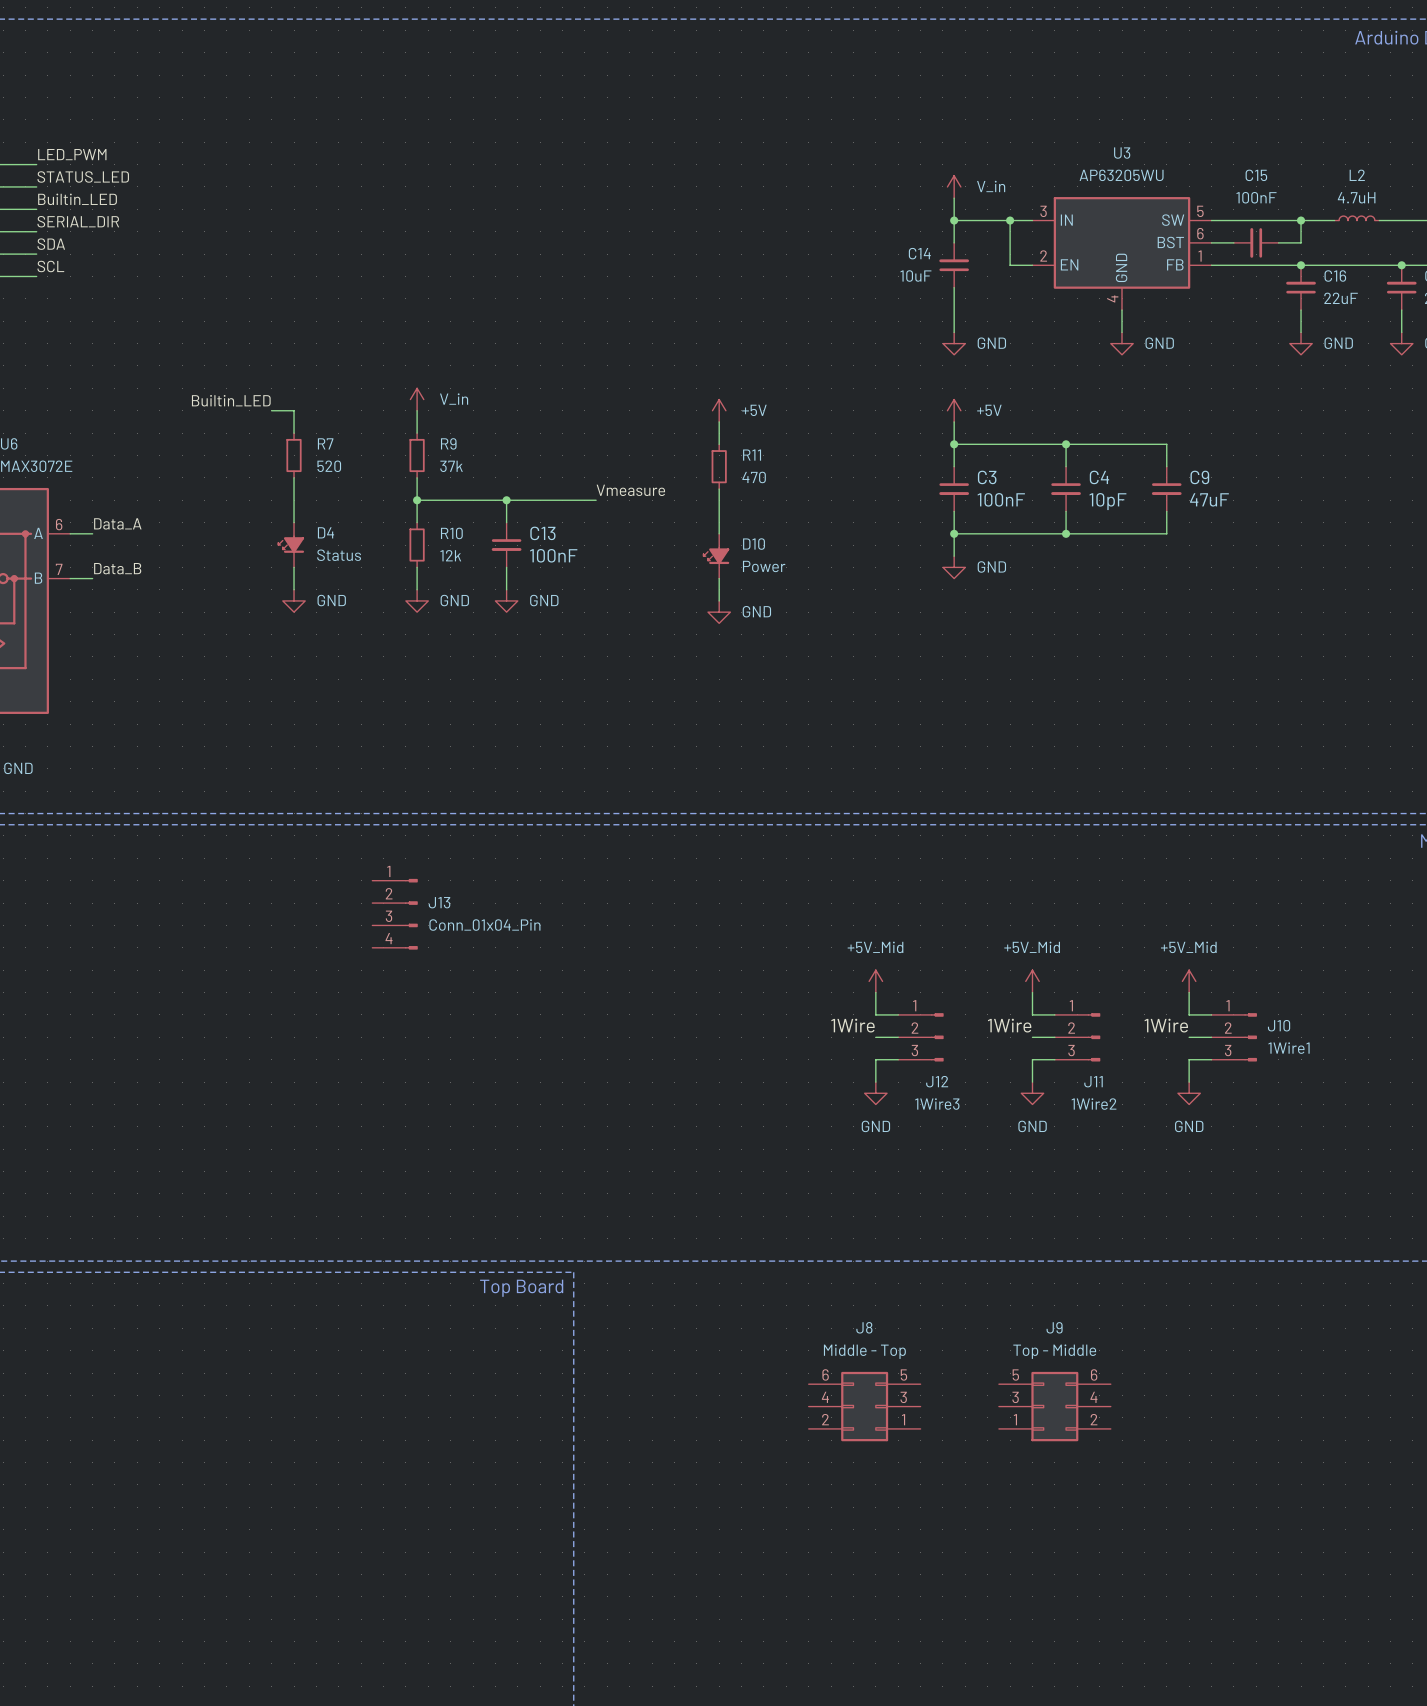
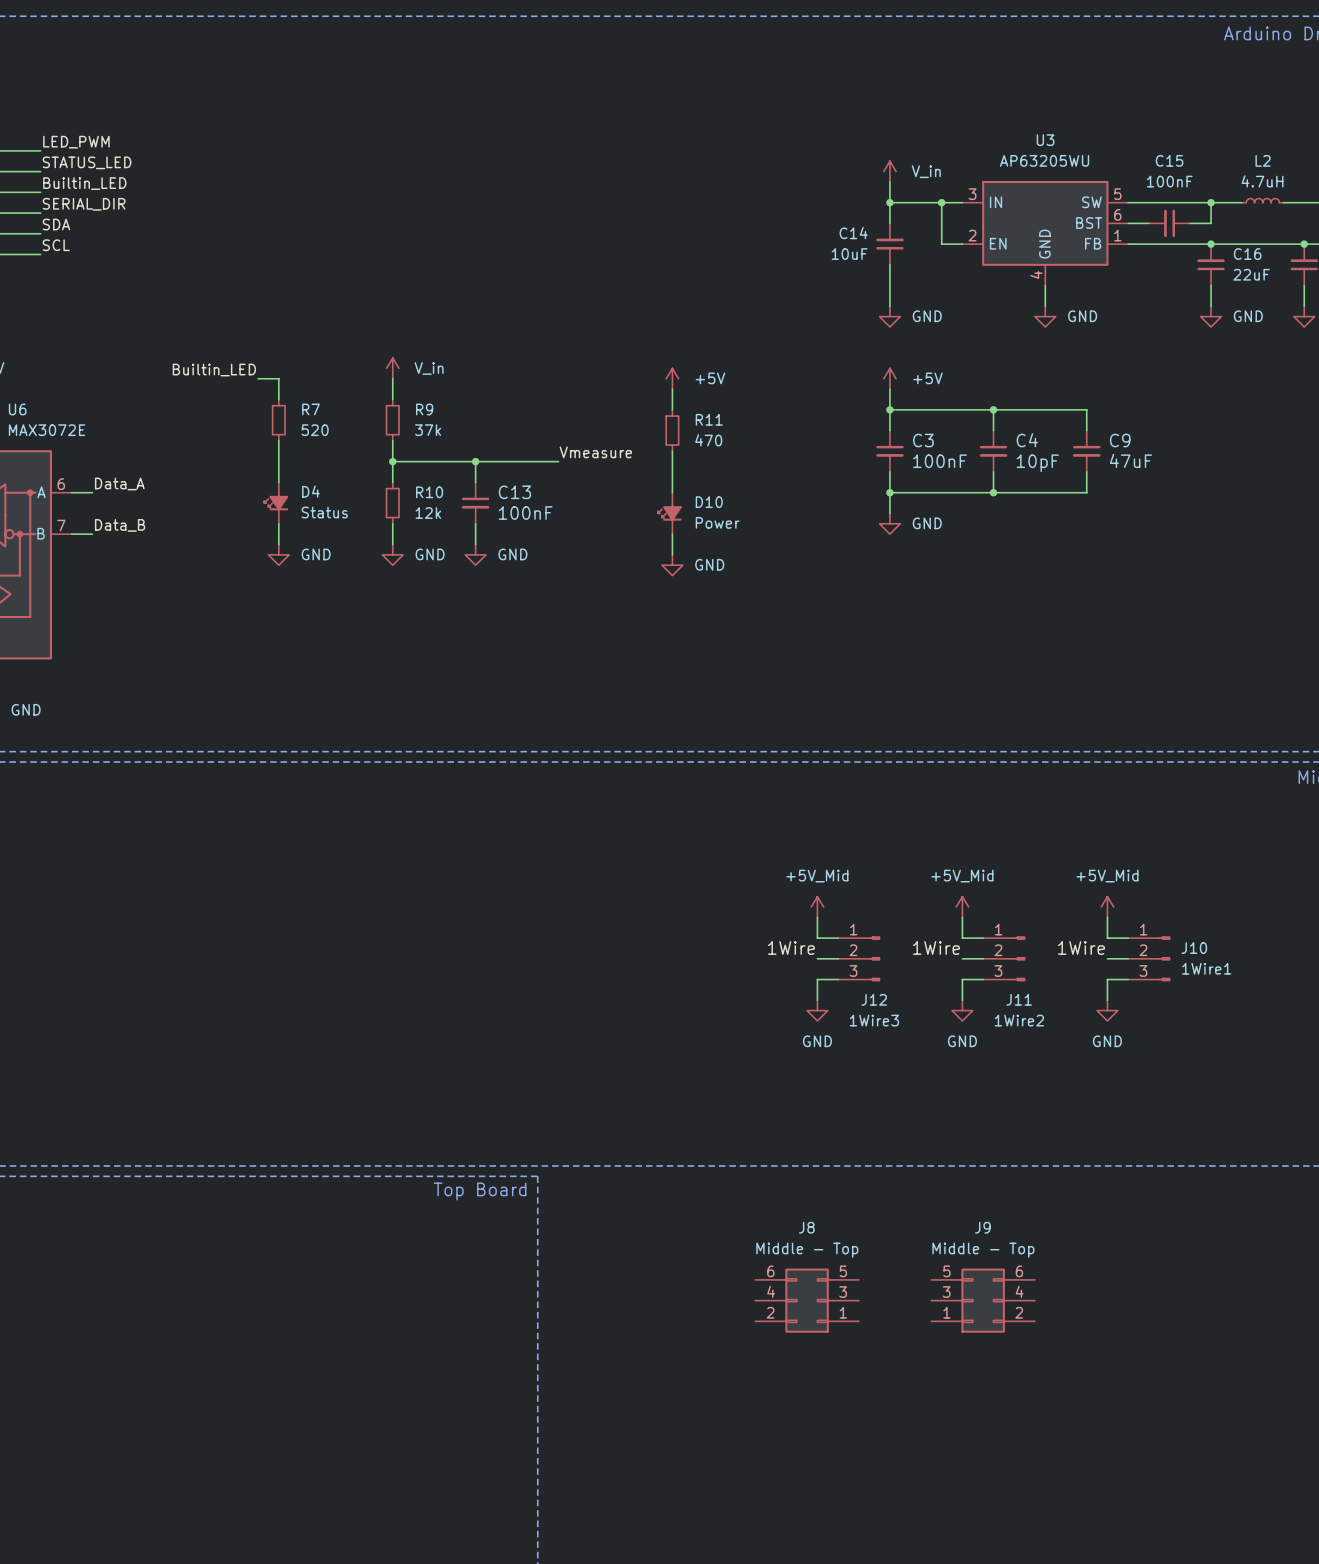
J13: Conn_01x04_Pin (395, 914) -> none
J9 value: Top - Middle (1054, 1351) -> Middle - Top (983, 1250)

